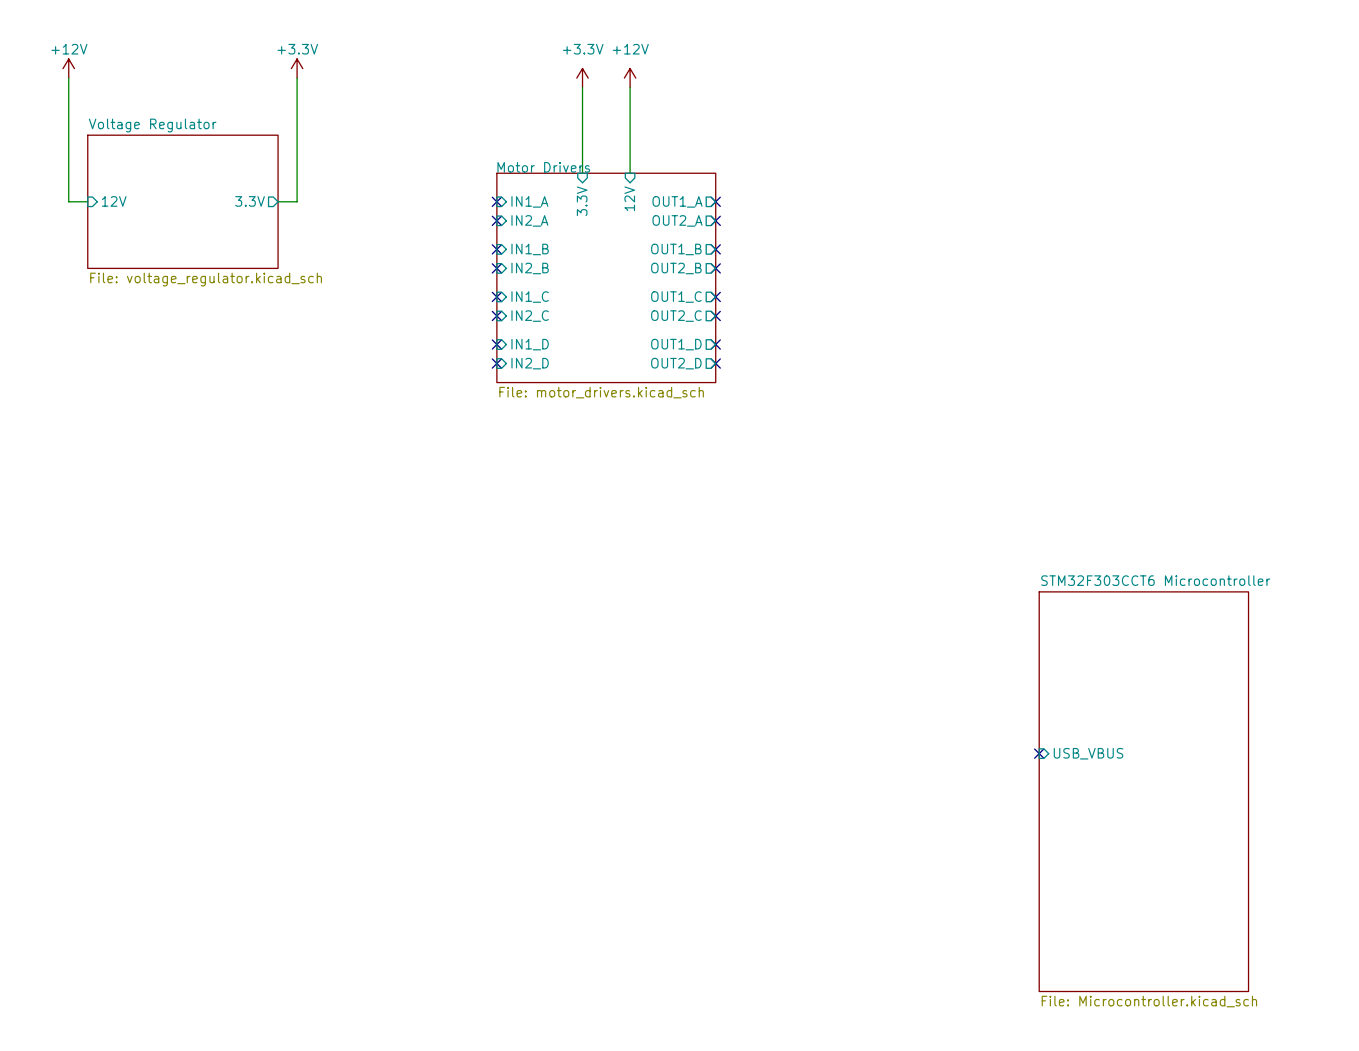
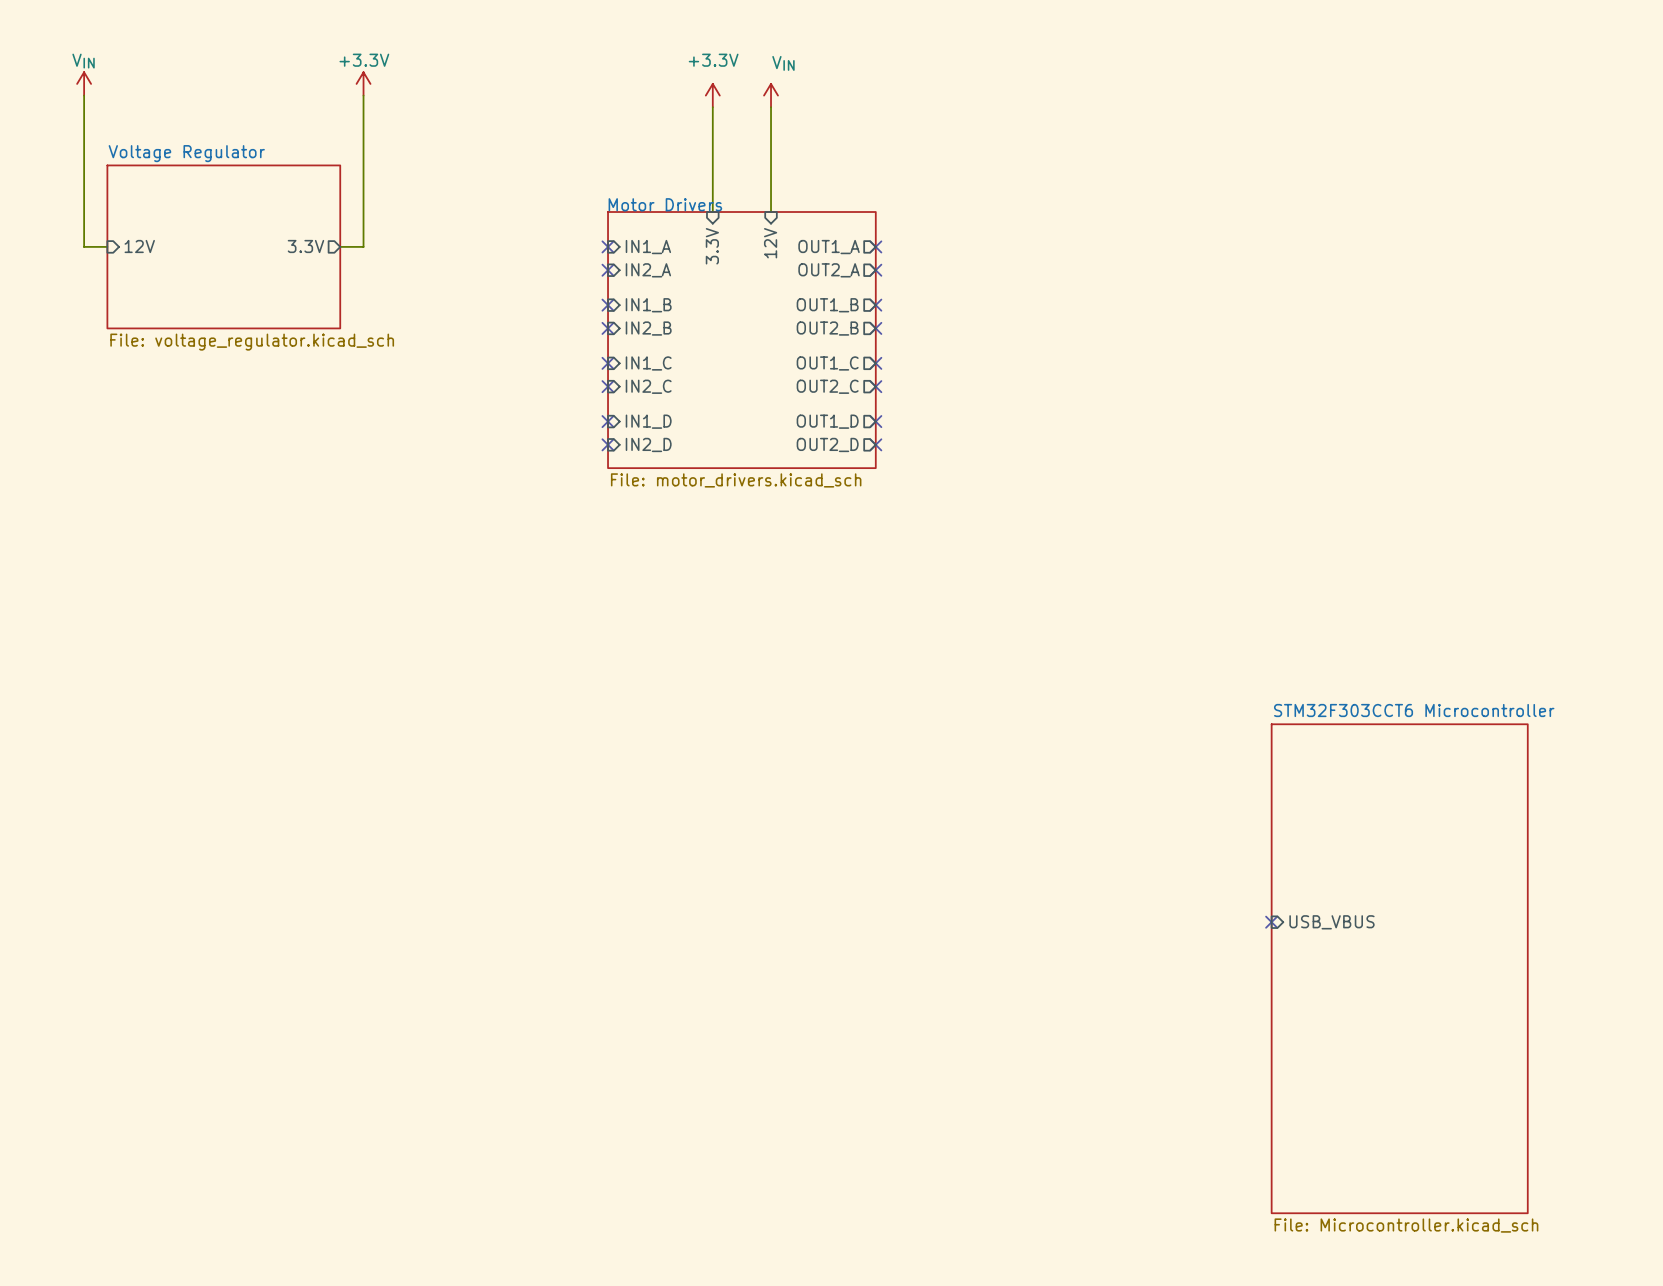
power symbol: +12V (68, 68) -> VIN (84, 83)
power symbol: +12V (630, 78) -> VIN (771, 95)

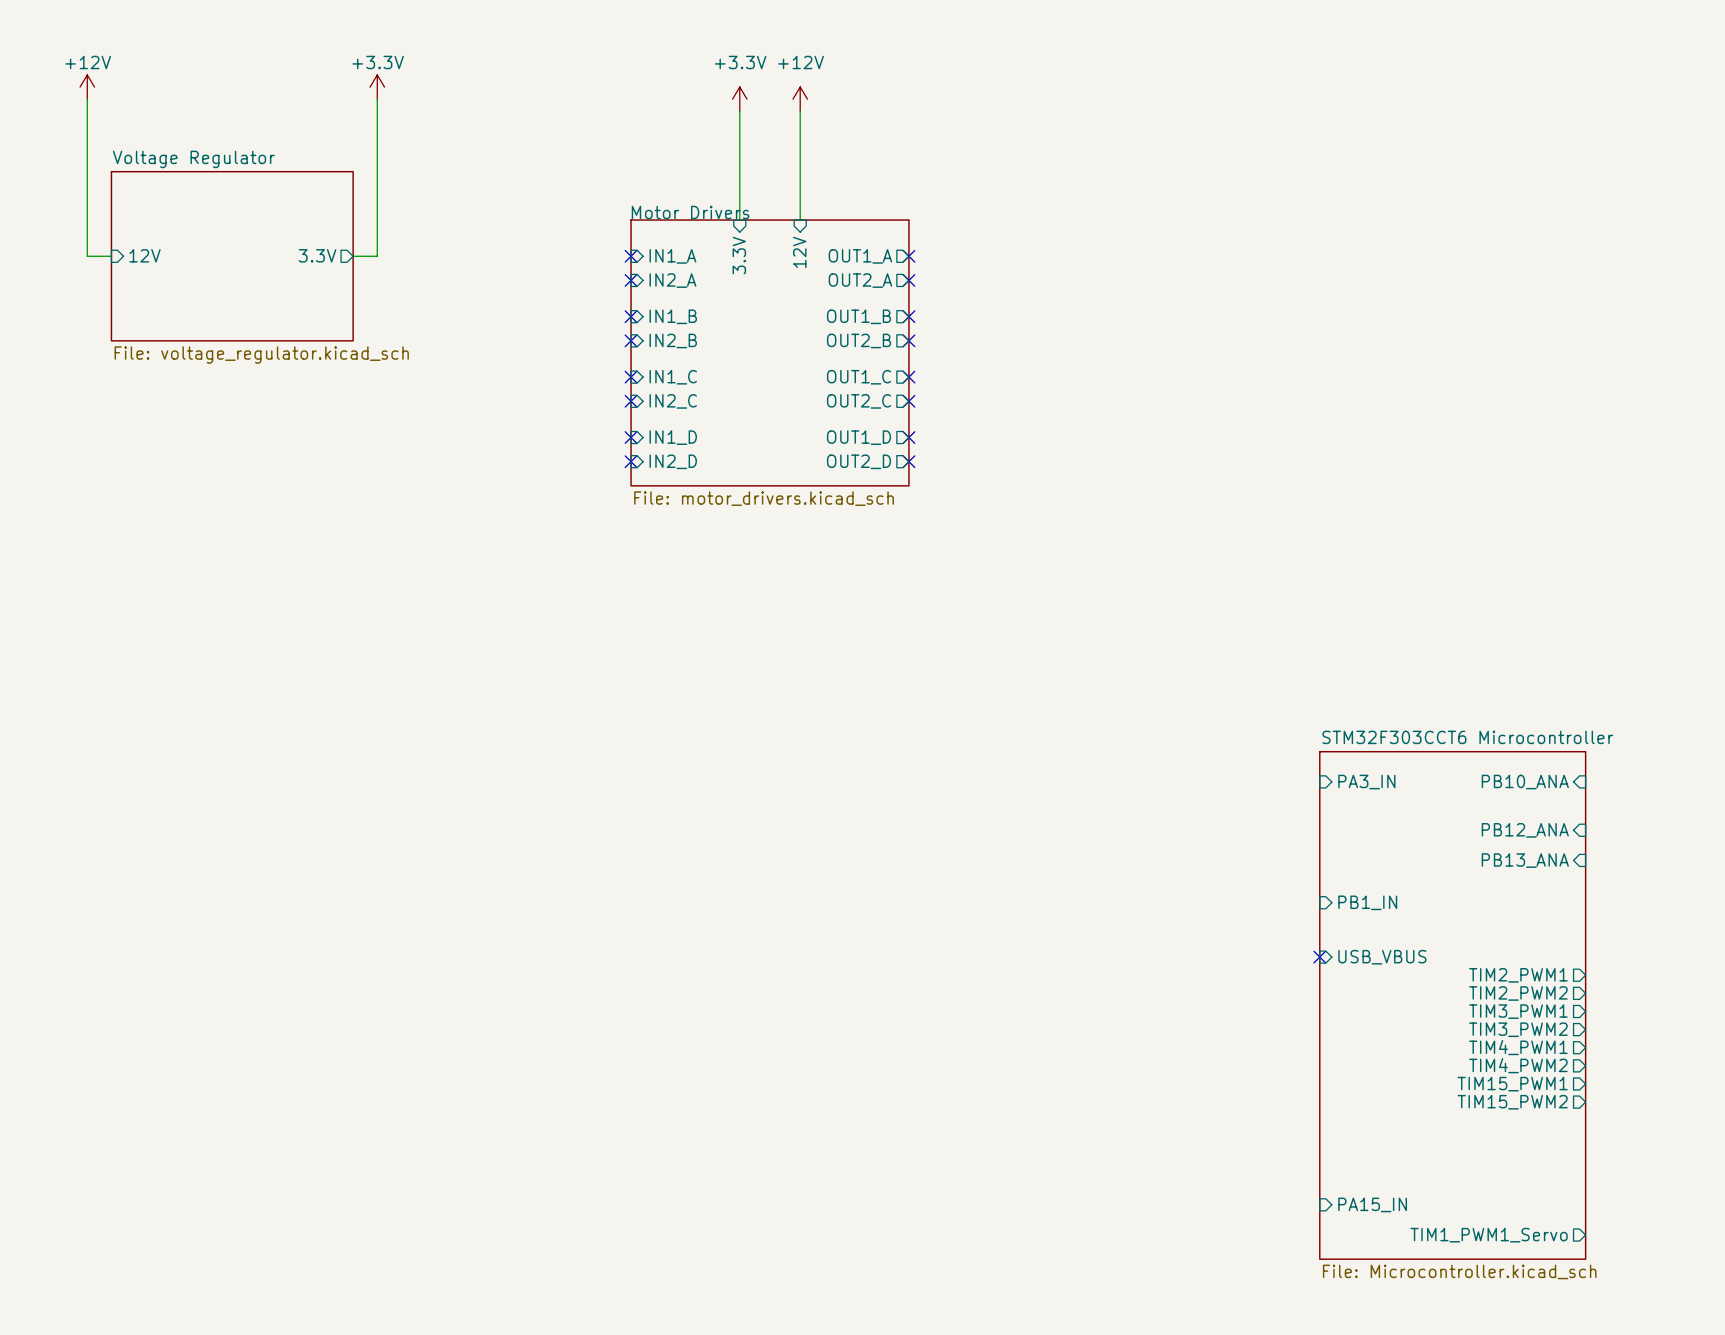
power symbol: VIN (84, 83) -> +12V (87, 87)
power symbol: VIN (771, 95) -> +12V (800, 99)
sheet pin: none -> PA3_IN (1366, 782)
sheet pin: none -> PB10_ANA (1525, 782)
sheet pin: none -> PB12_ANA (1525, 830)
sheet pin: none -> PB13_ANA (1525, 860)
sheet pin: none -> PB1_IN (1367, 902)
sheet pin: none -> TIM2_PWM1 (1518, 975)
sheet pin: none -> TIM2_PWM2 (1518, 993)
sheet pin: none -> TIM3_PWM1 (1518, 1011)
sheet pin: none -> TIM3_PWM2 (1518, 1029)
sheet pin: none -> TIM4_PWM1 (1518, 1047)
sheet pin: none -> TIM4_PWM2 (1518, 1065)
sheet pin: none -> TIM15_PWM1 (1512, 1084)
sheet pin: none -> TIM15_PWM2 (1512, 1102)
sheet pin: none -> PA15_IN (1372, 1204)
sheet pin: none -> TIM1_PWM1_Servo (1489, 1235)

